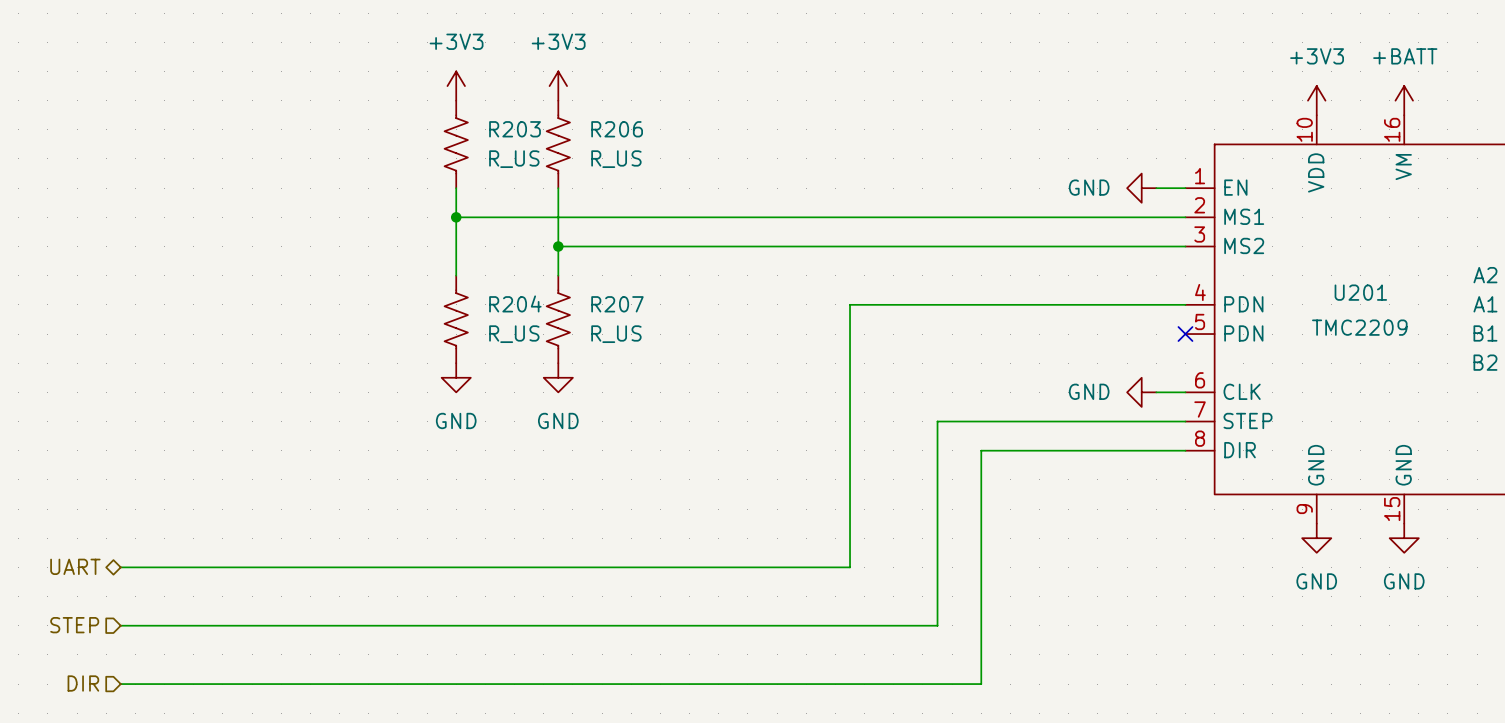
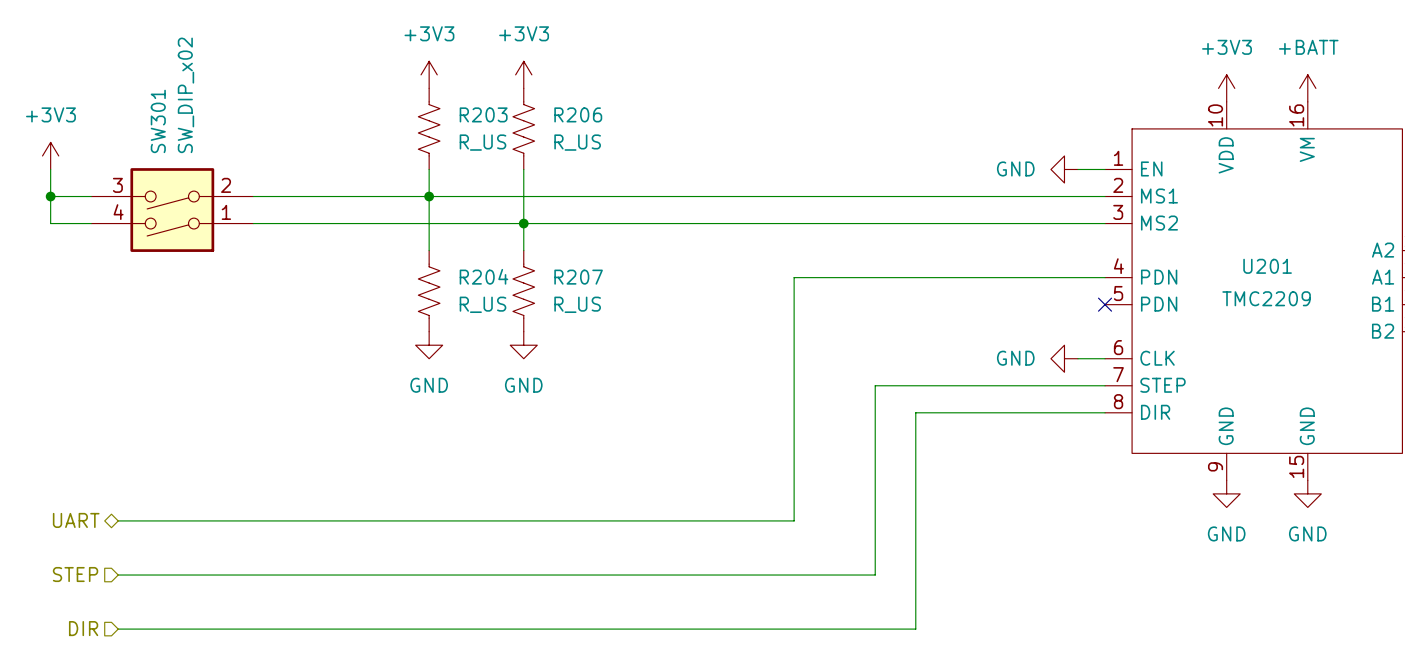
power symbol: none -> +3V3 (50, 155)
wire: none -> (50, 169) (50, 223) (91, 223)
wire: none -> (50, 196) (91, 196)
junction: none -> (50, 196)
wire: none -> (253, 196) (429, 196)
SW301: none -> SW_DIP_x02 (172, 210)
wire: none -> (253, 223) (523, 223)

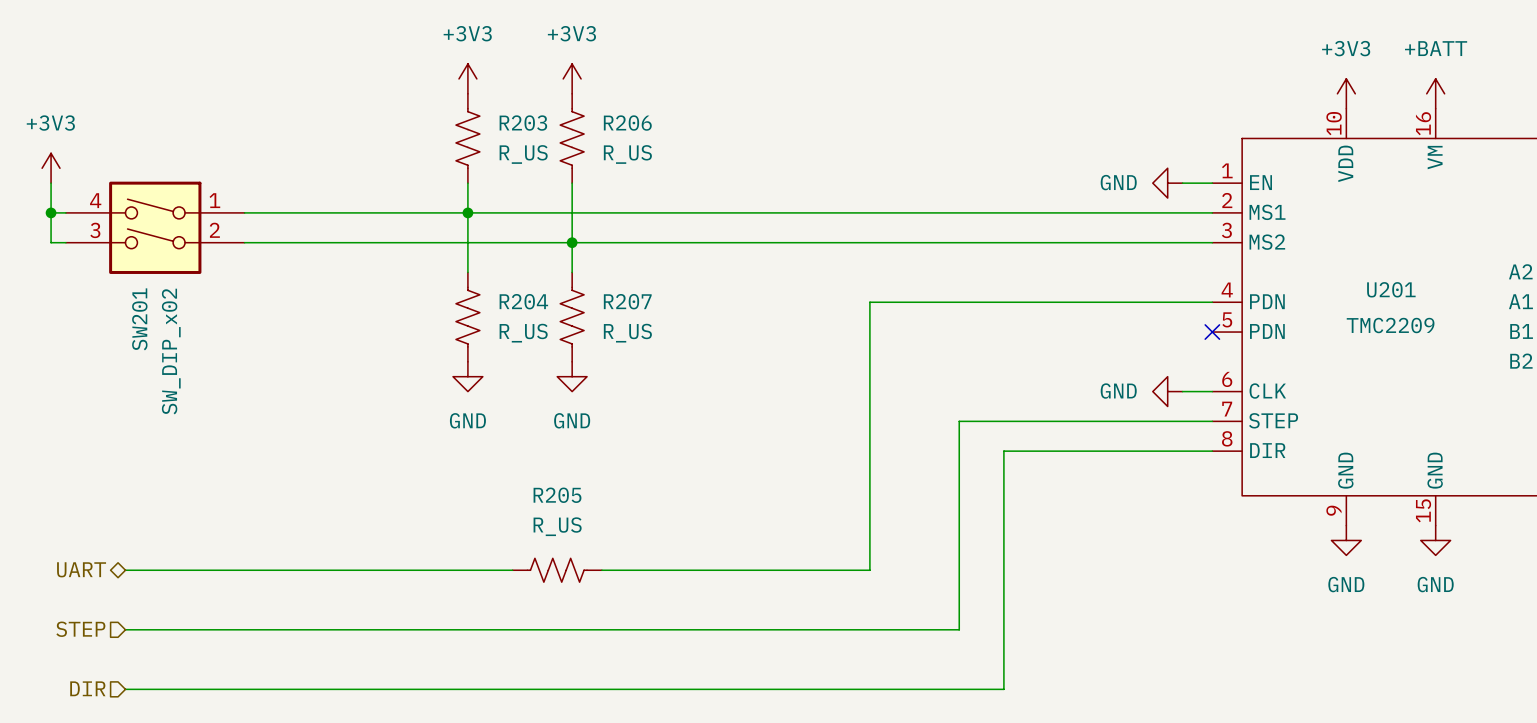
SW201: none -> SW_DIP_x02 (155, 227)
SW301: SW_DIP_x02 (172, 210) -> none
R205: none -> R_US (557, 570)

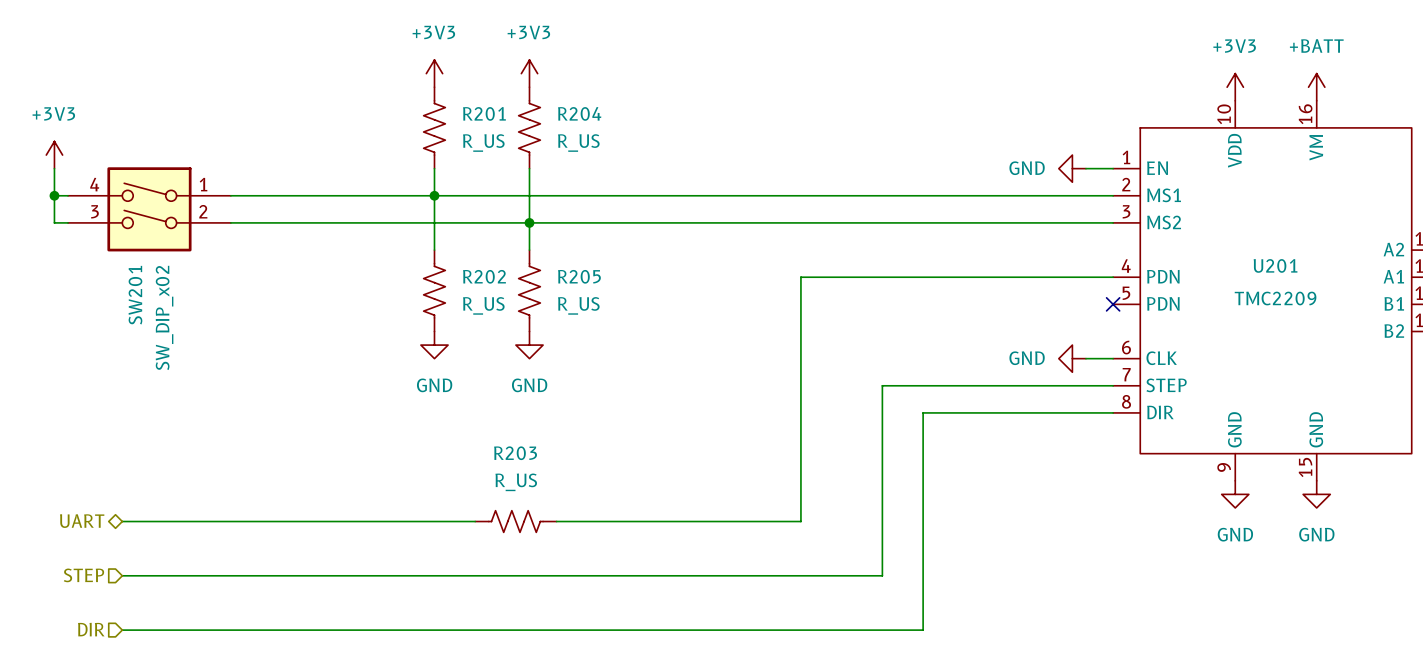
R203 name: R203 (523, 123) -> R201 (484, 113)
R206 name: R206 (627, 123) -> R204 (579, 113)
R204 name: R204 (523, 301) -> R202 (484, 276)
R207 name: R207 (627, 301) -> R205 (579, 276)
R205 name: R205 (557, 495) -> R203 (515, 453)

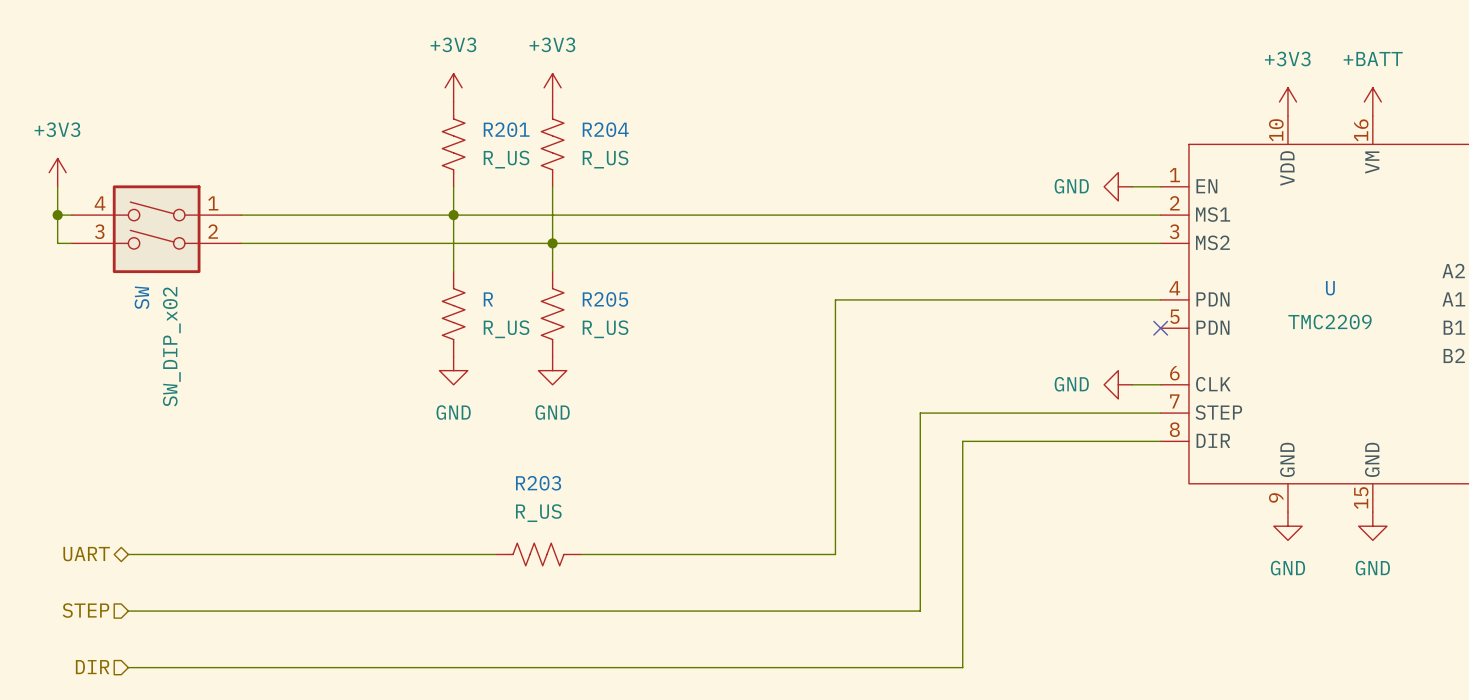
U201 name: U201 (1275, 265) -> U (1330, 288)
R202 name: R202 (484, 276) -> R (488, 299)
SW201 name: SW201 (135, 295) -> SW (141, 297)

